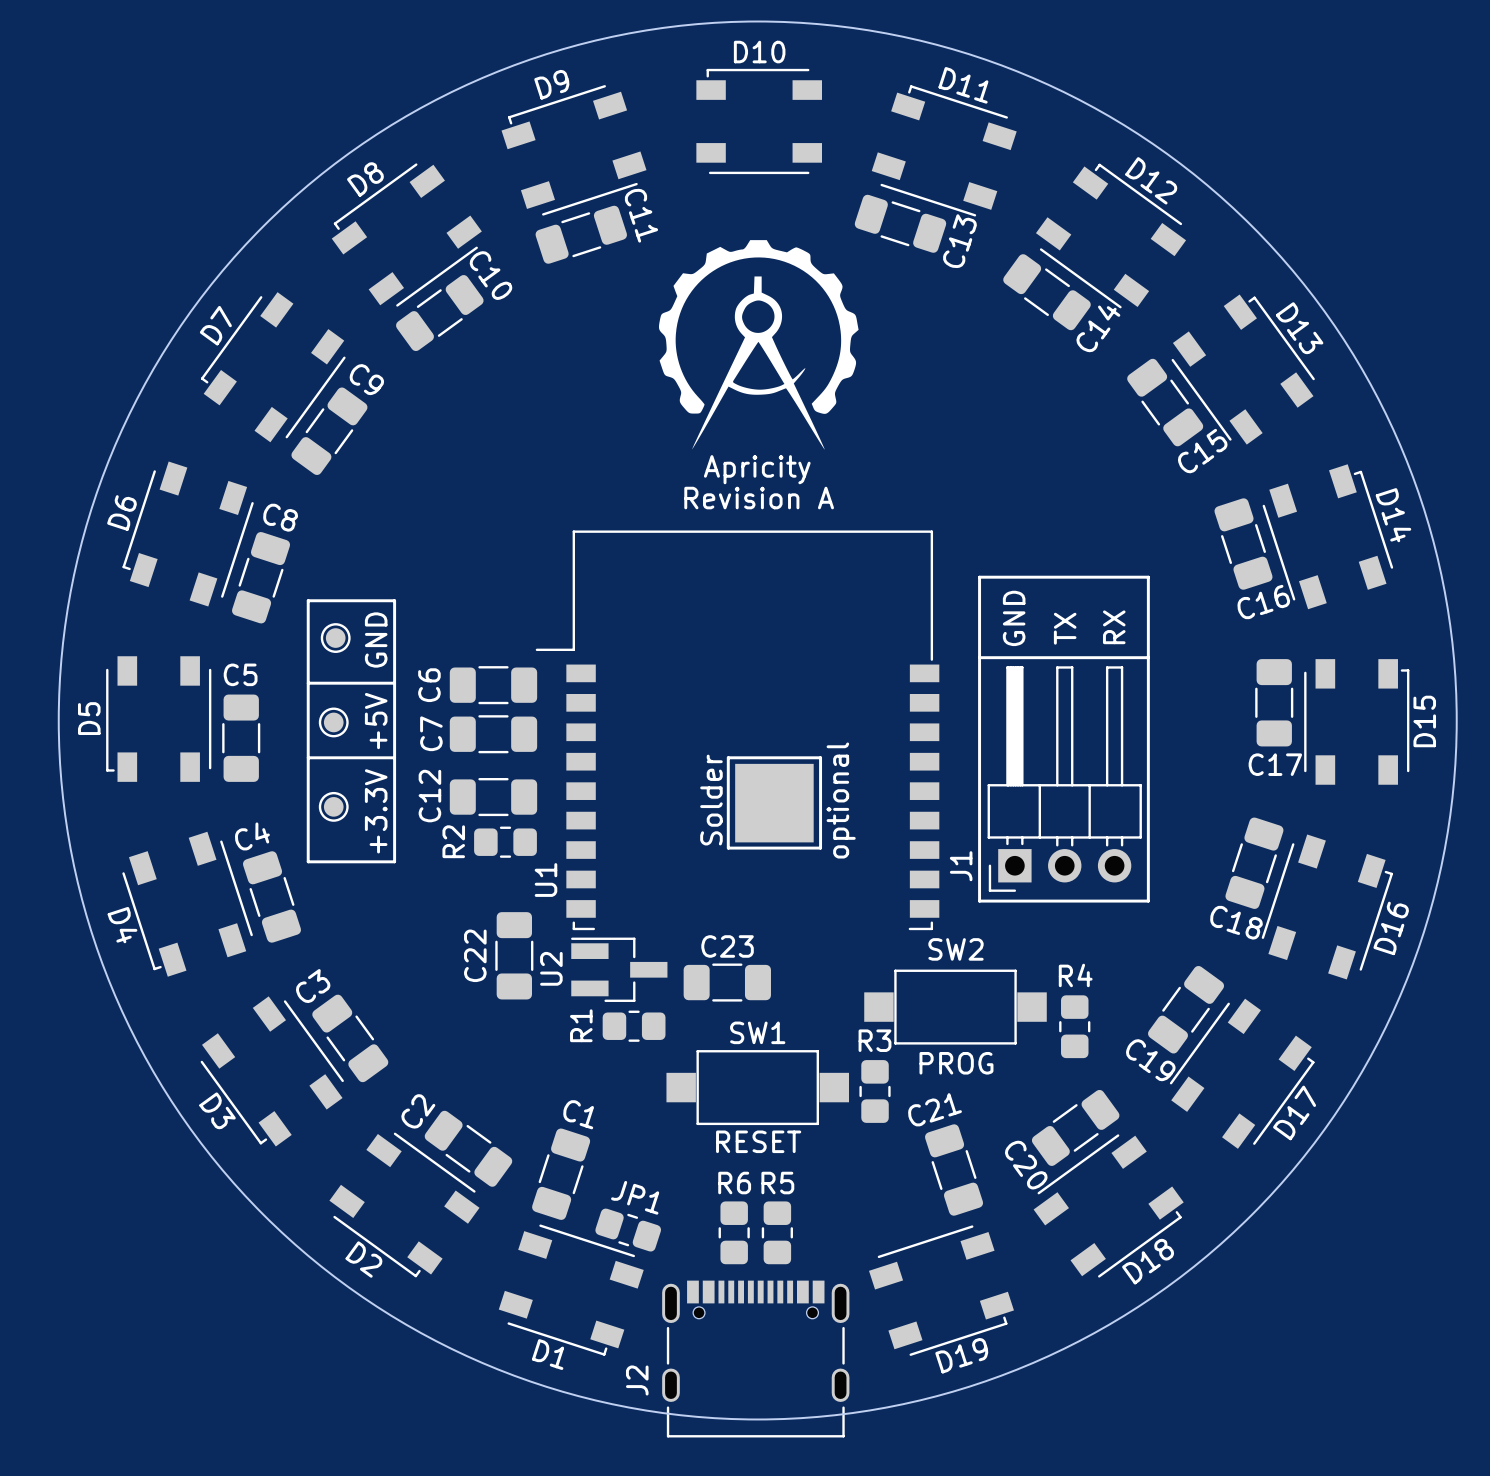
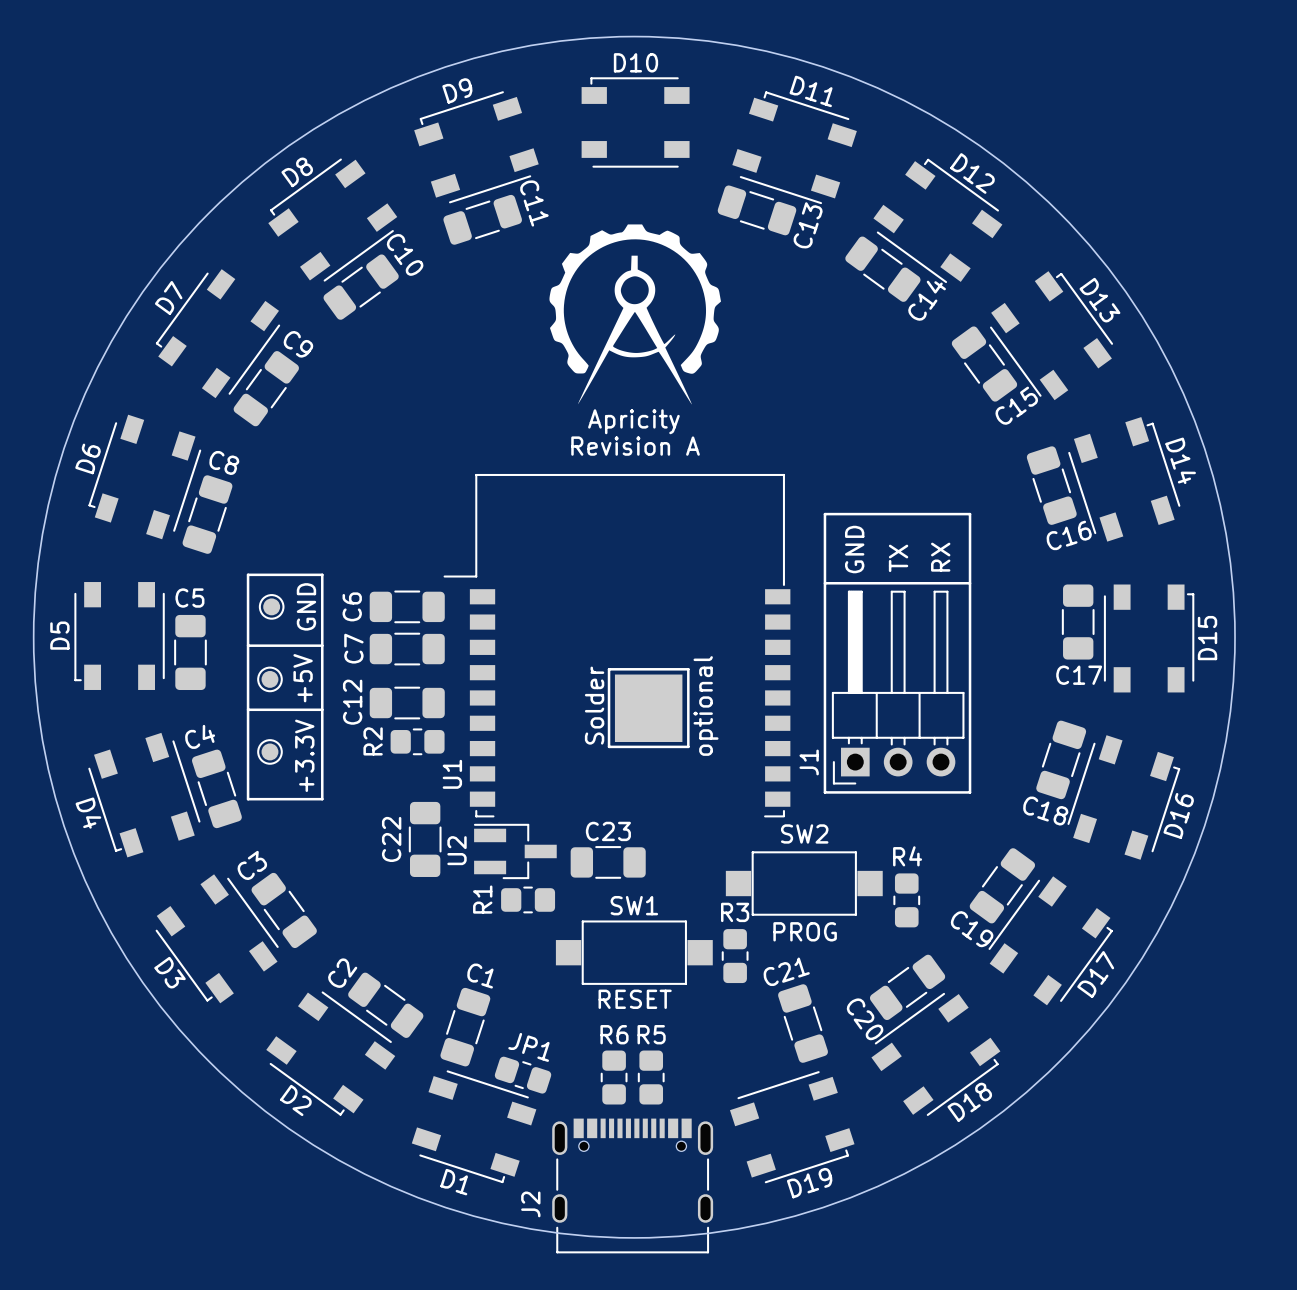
part: (335, 638) -> none
text position: GND (376, 640) -> GND (306, 606)
line: (308, 647) (308, 600) (394, 600) (394, 647) -> (248, 574) (322, 574)
line: (308, 683) (394, 683) -> (248, 645) (322, 645)
part: none -> (271, 606)
text position: +5V (376, 721) -> +5V (303, 678)
part: (333, 722) -> none
line: (308, 757) (394, 757) -> (248, 709) (322, 709)
part: none -> (269, 679)
part: (333, 806) -> none
text position: +3.3V (376, 811) -> +3.3V (304, 755)
part: none -> (269, 751)
line: (308, 861) (394, 861) -> (248, 758) (248, 799) (322, 799) (322, 758)

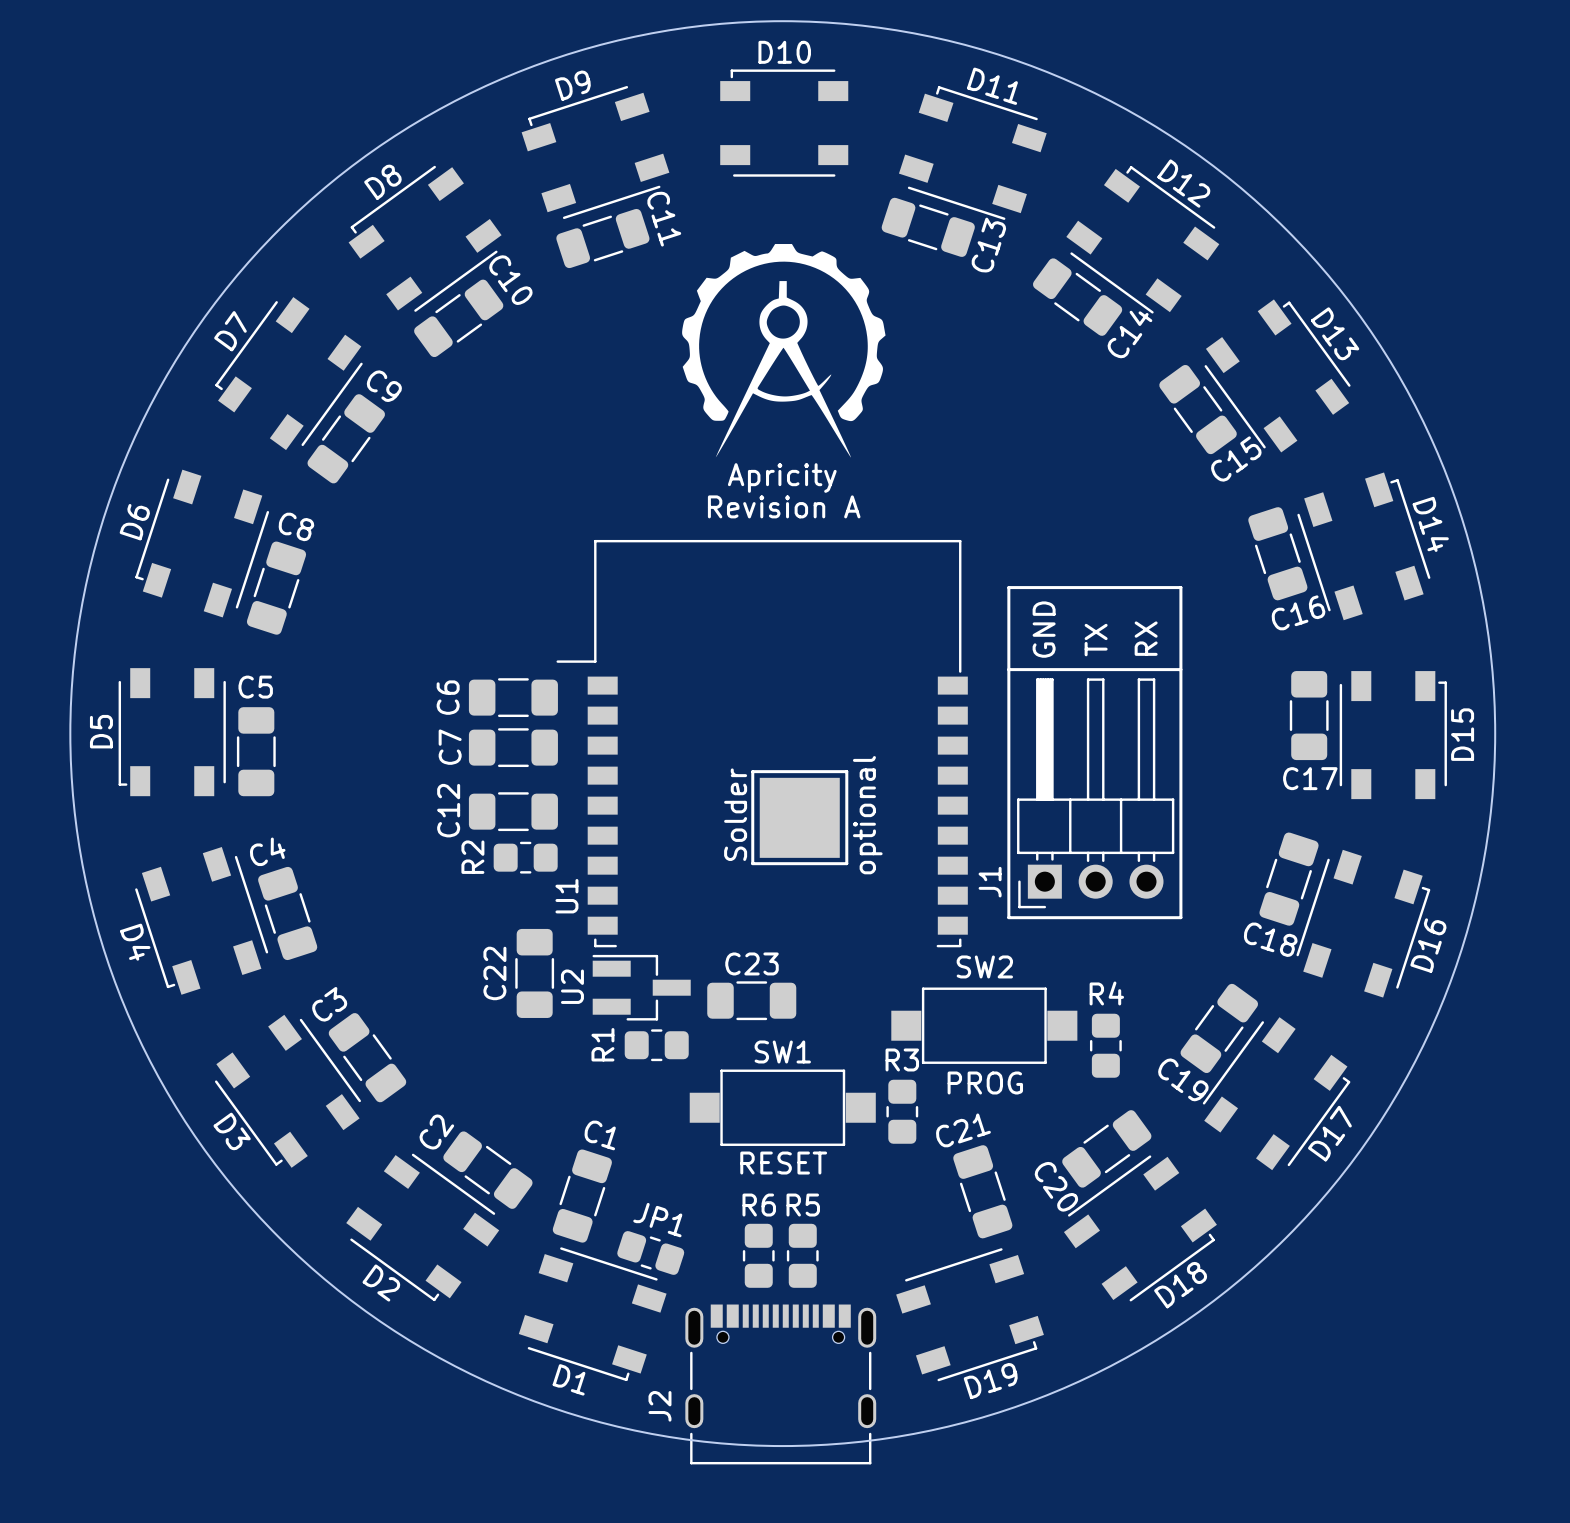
line: (248, 574) (322, 574) (322, 799) (248, 799) (248, 574) -> none
part: (271, 606) -> none
text: GND (306, 606) -> none
line: (248, 645) (322, 645) -> none
text: +5V (303, 678) -> none
part: (269, 679) -> none
line: (248, 709) (322, 709) -> none
part: (269, 751) -> none
text: +3.3V (304, 755) -> none

